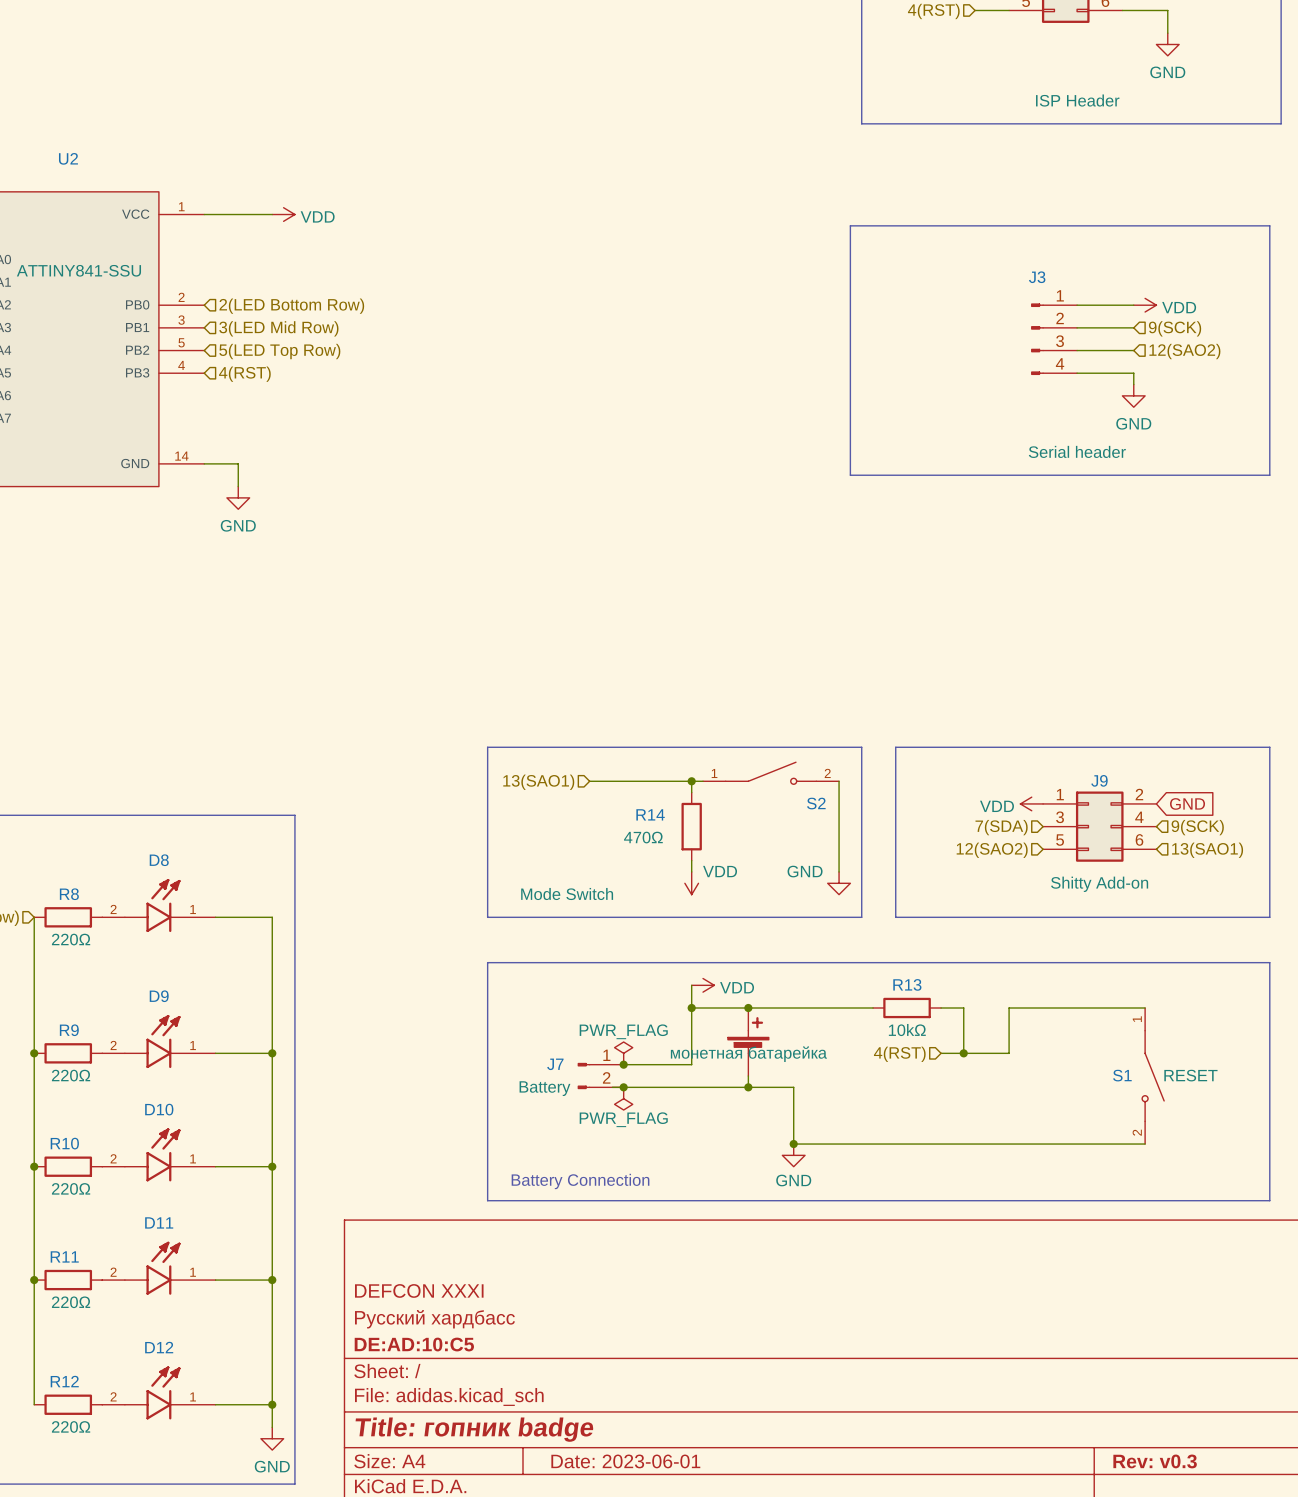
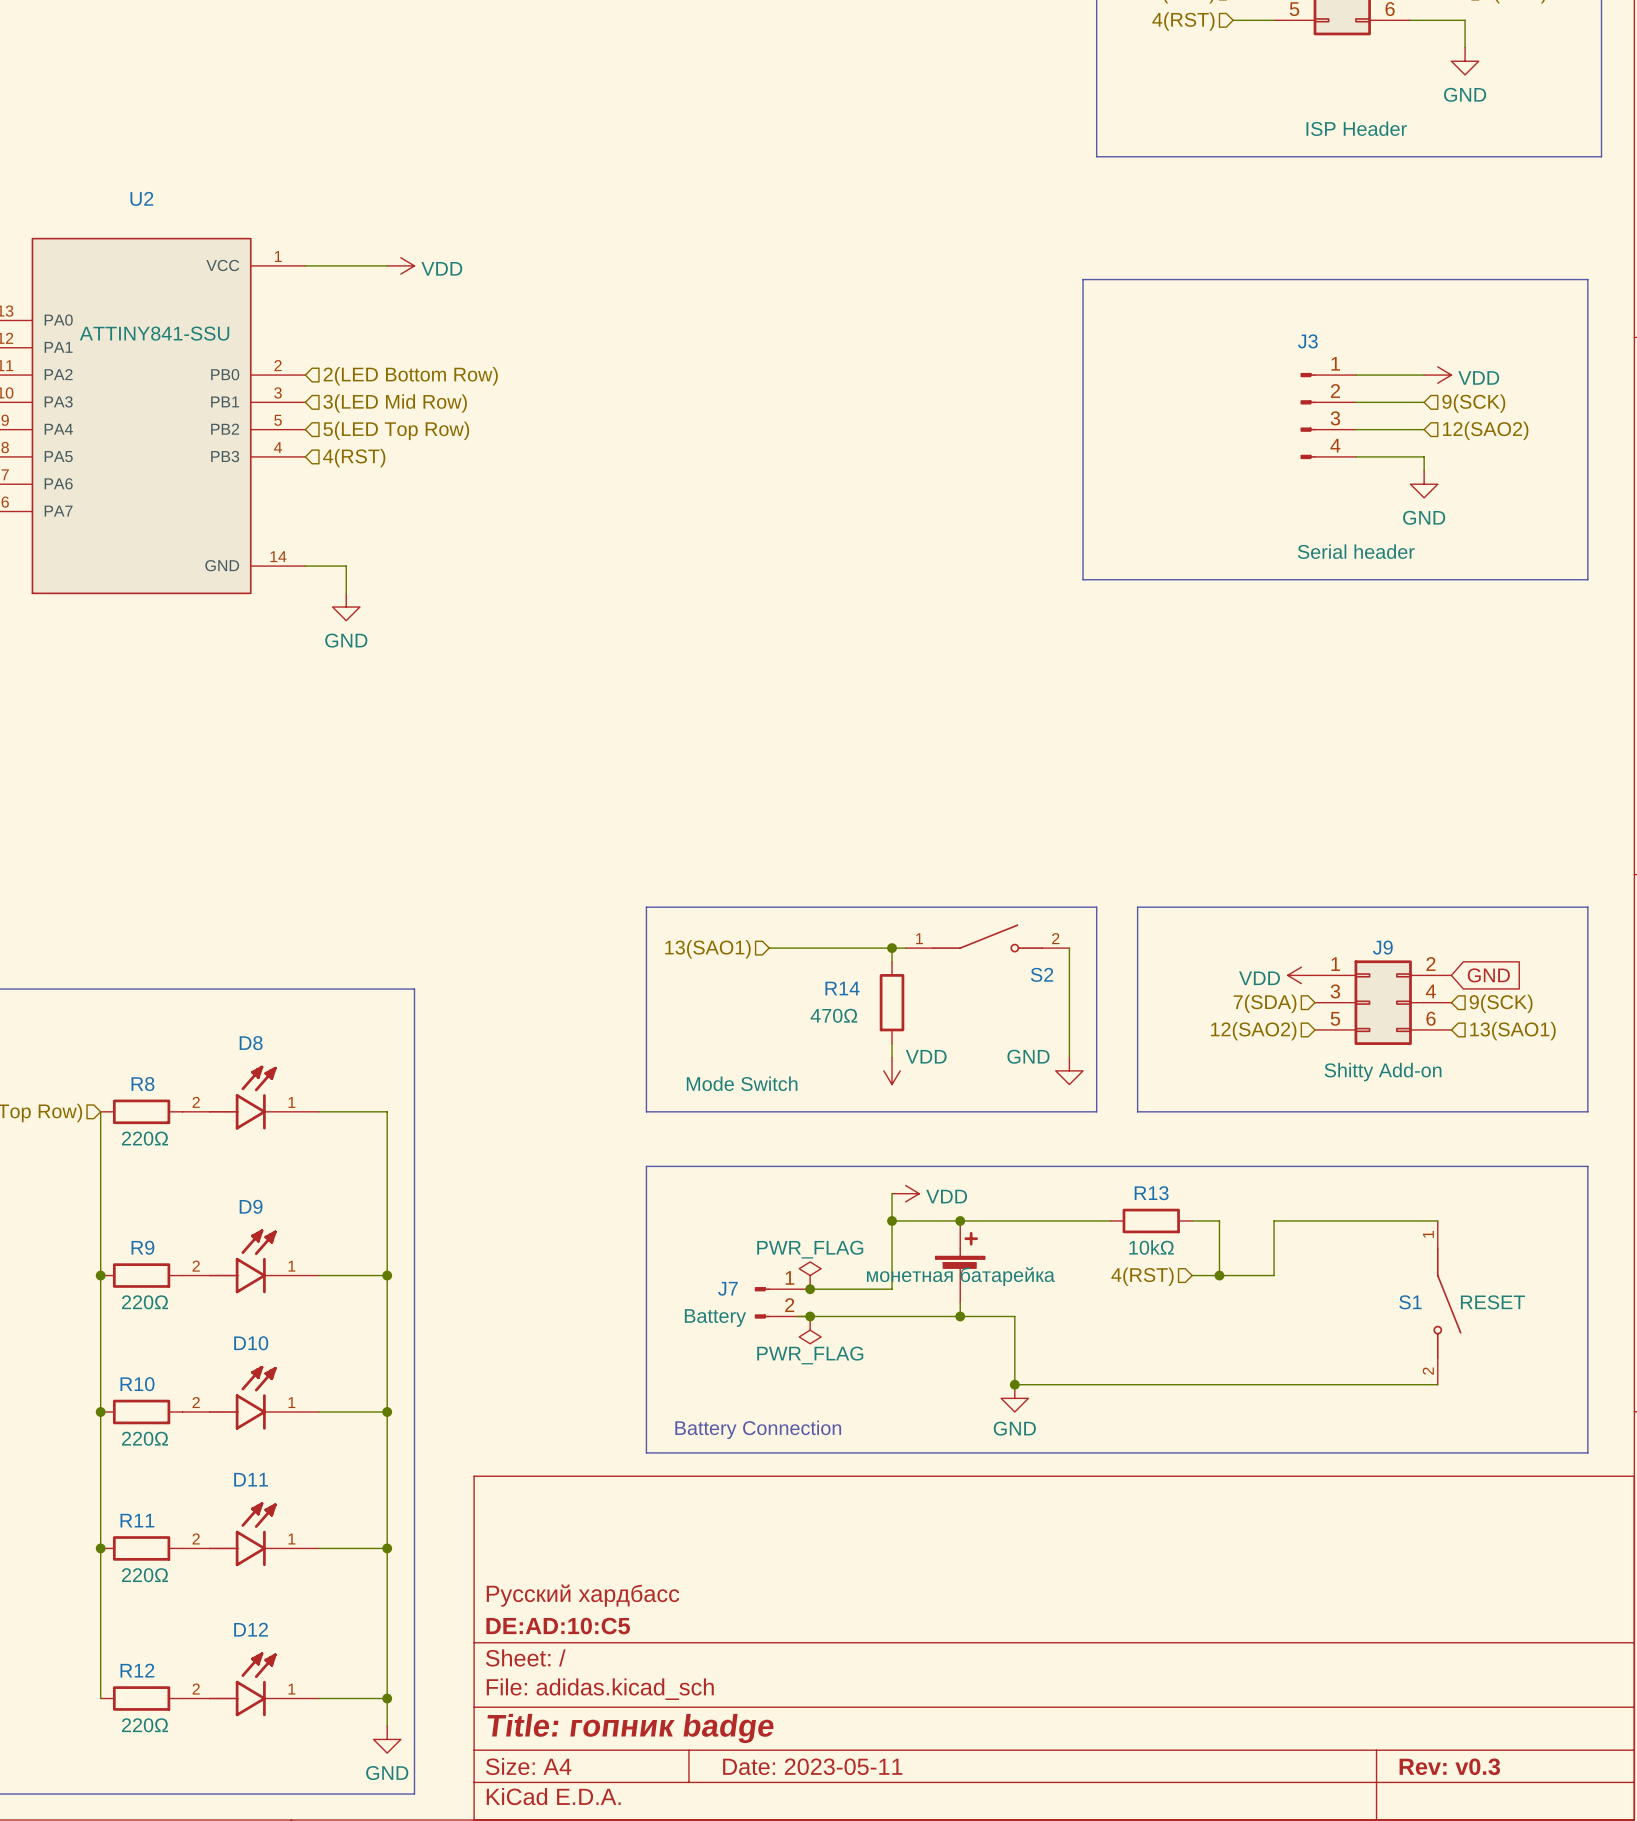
title block: DEFCON XXXI (419, 1290) -> none
title block: Date: 2023-06-01 (625, 1461) -> Date: 2023-05-11 (812, 1766)

